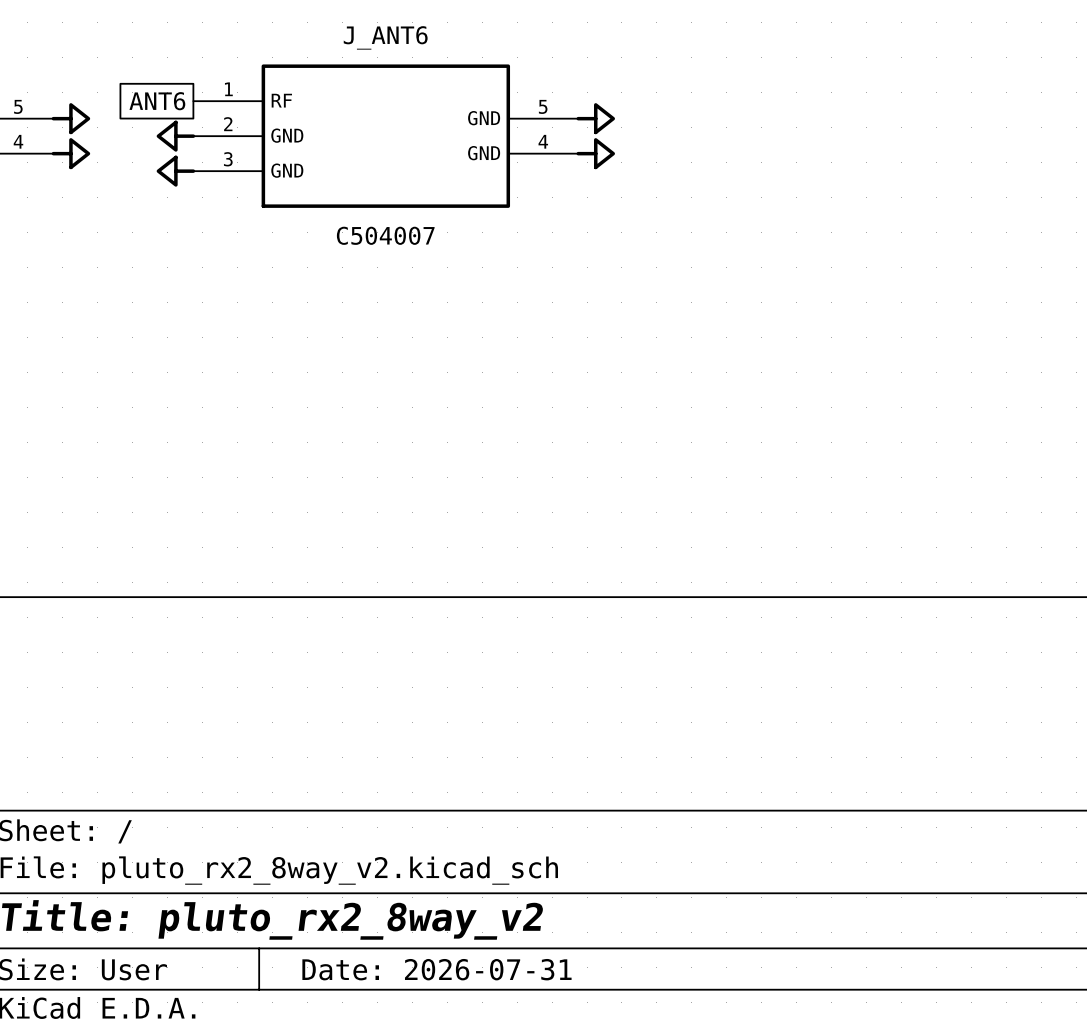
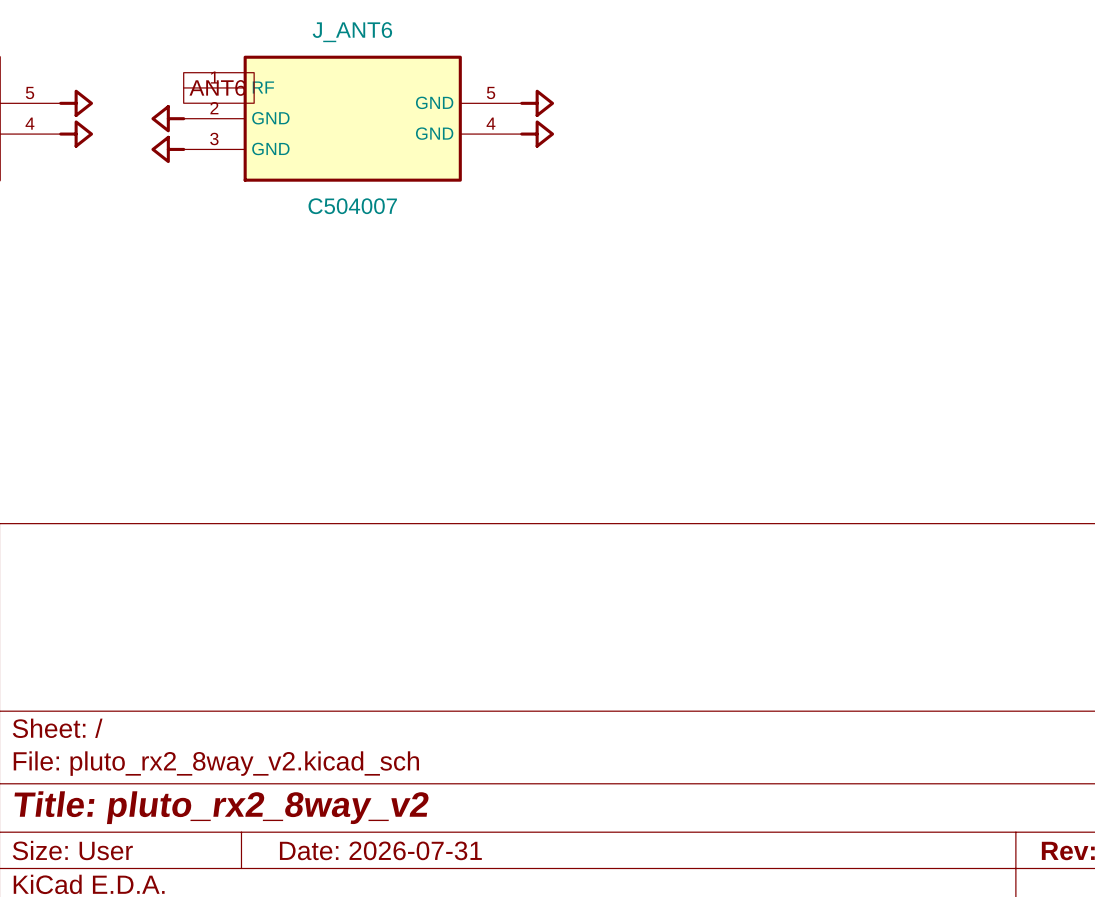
global label rotation: 0° (157, 101) -> 180° (217, 87)

